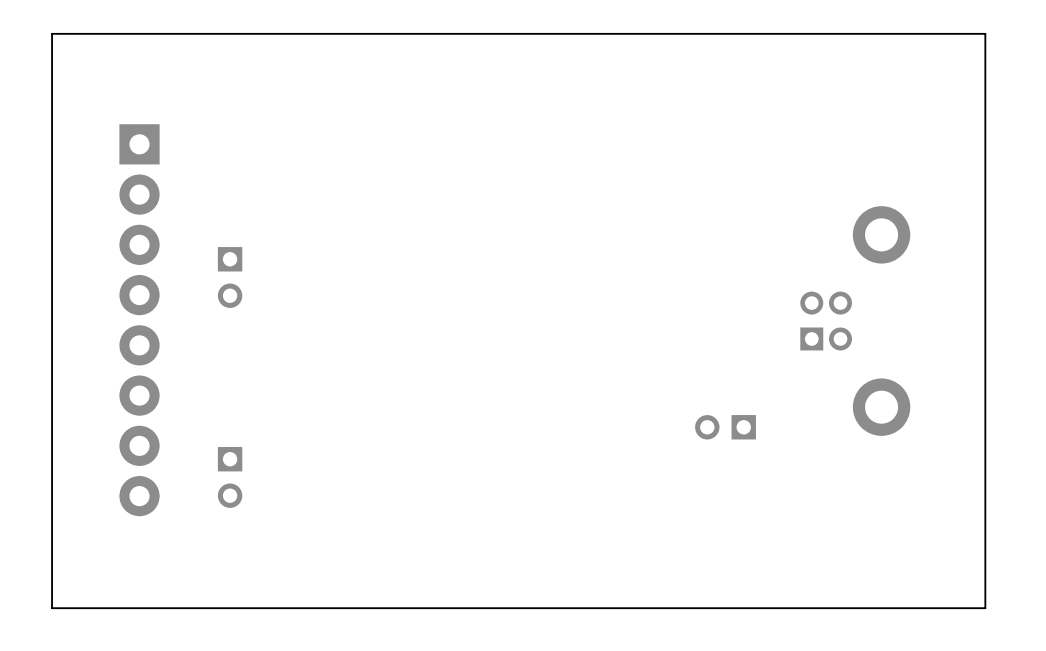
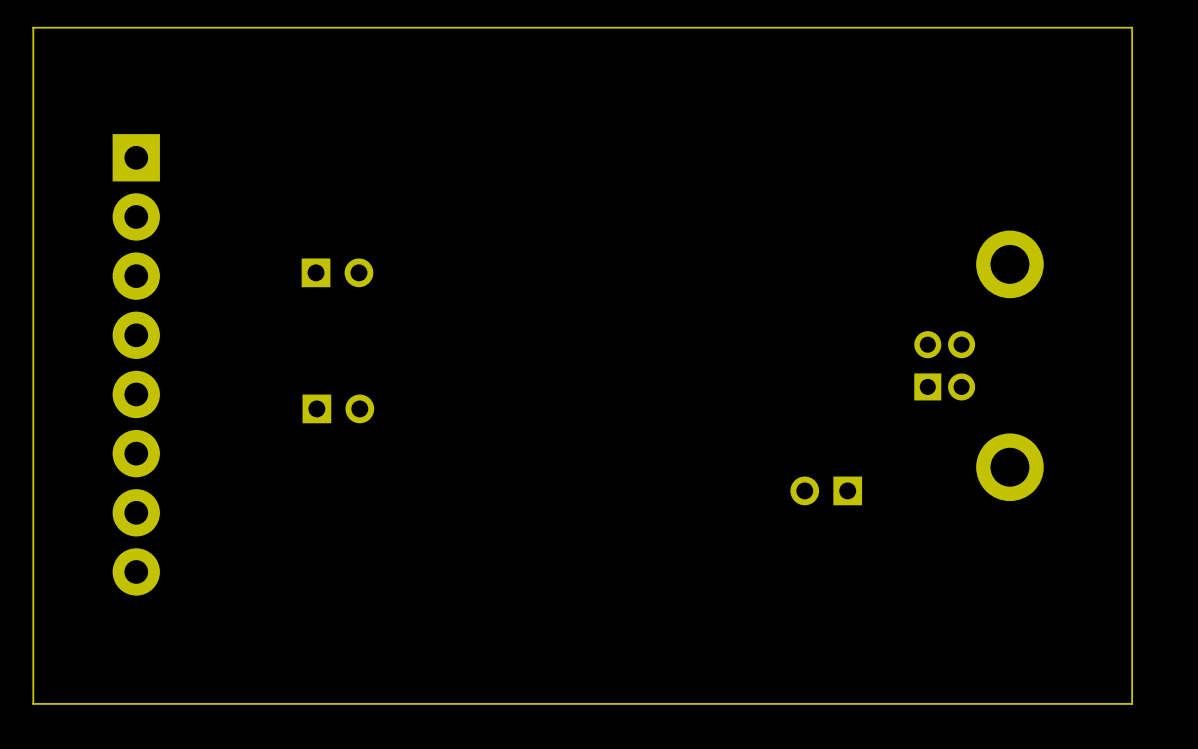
part: none -> (337, 272)
part: (230, 277) -> none
part: none -> (338, 408)
part: (230, 477) -> none

